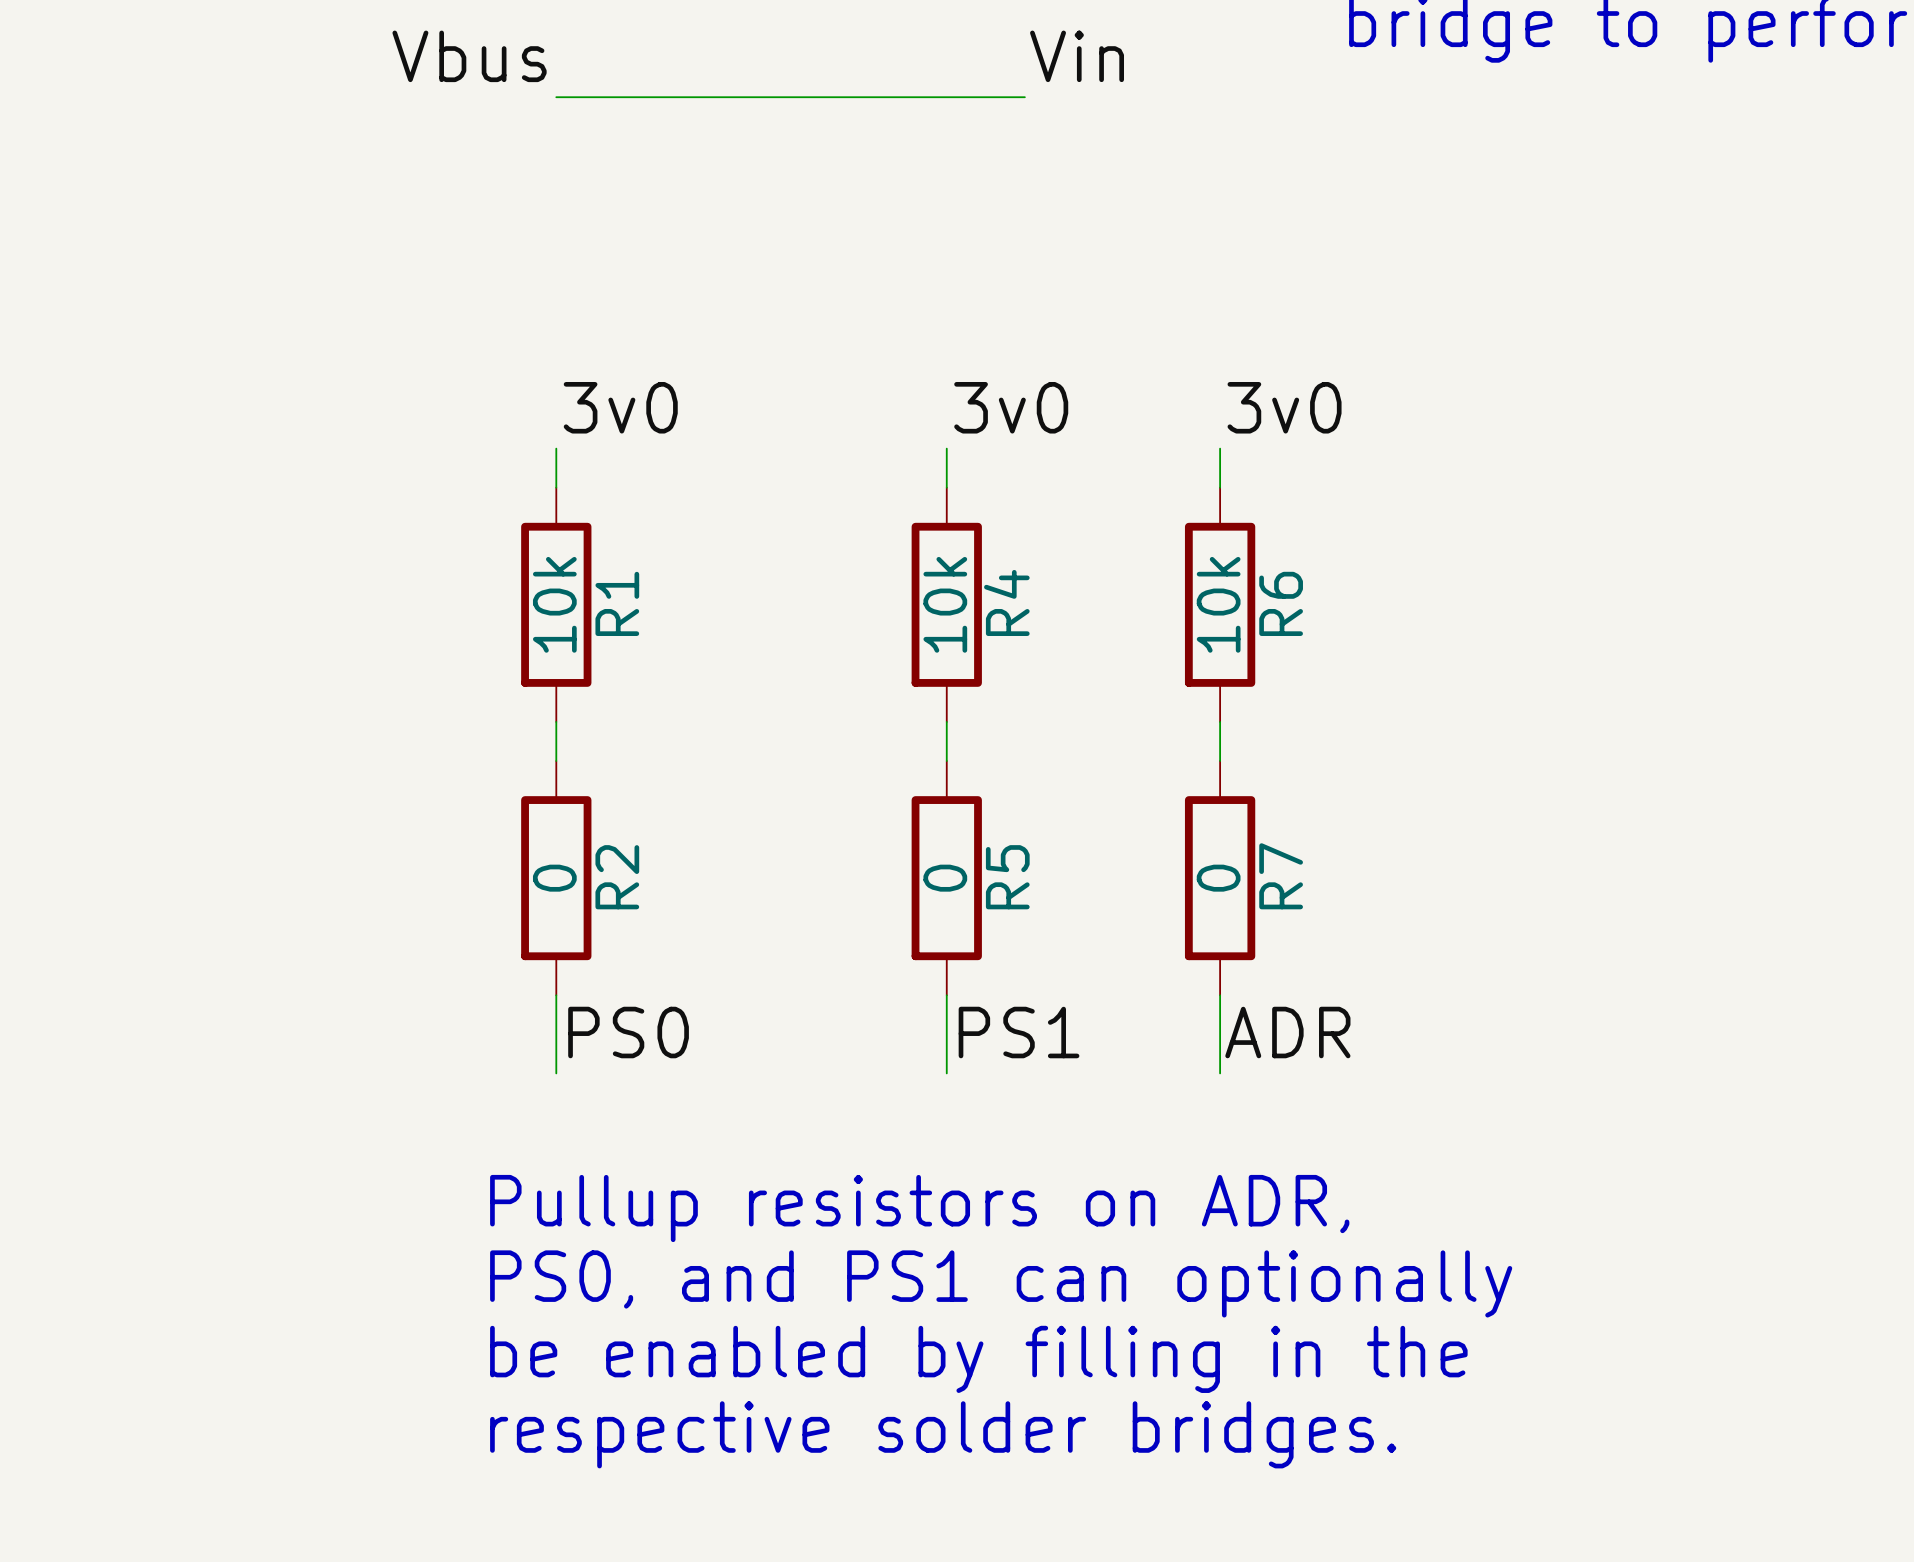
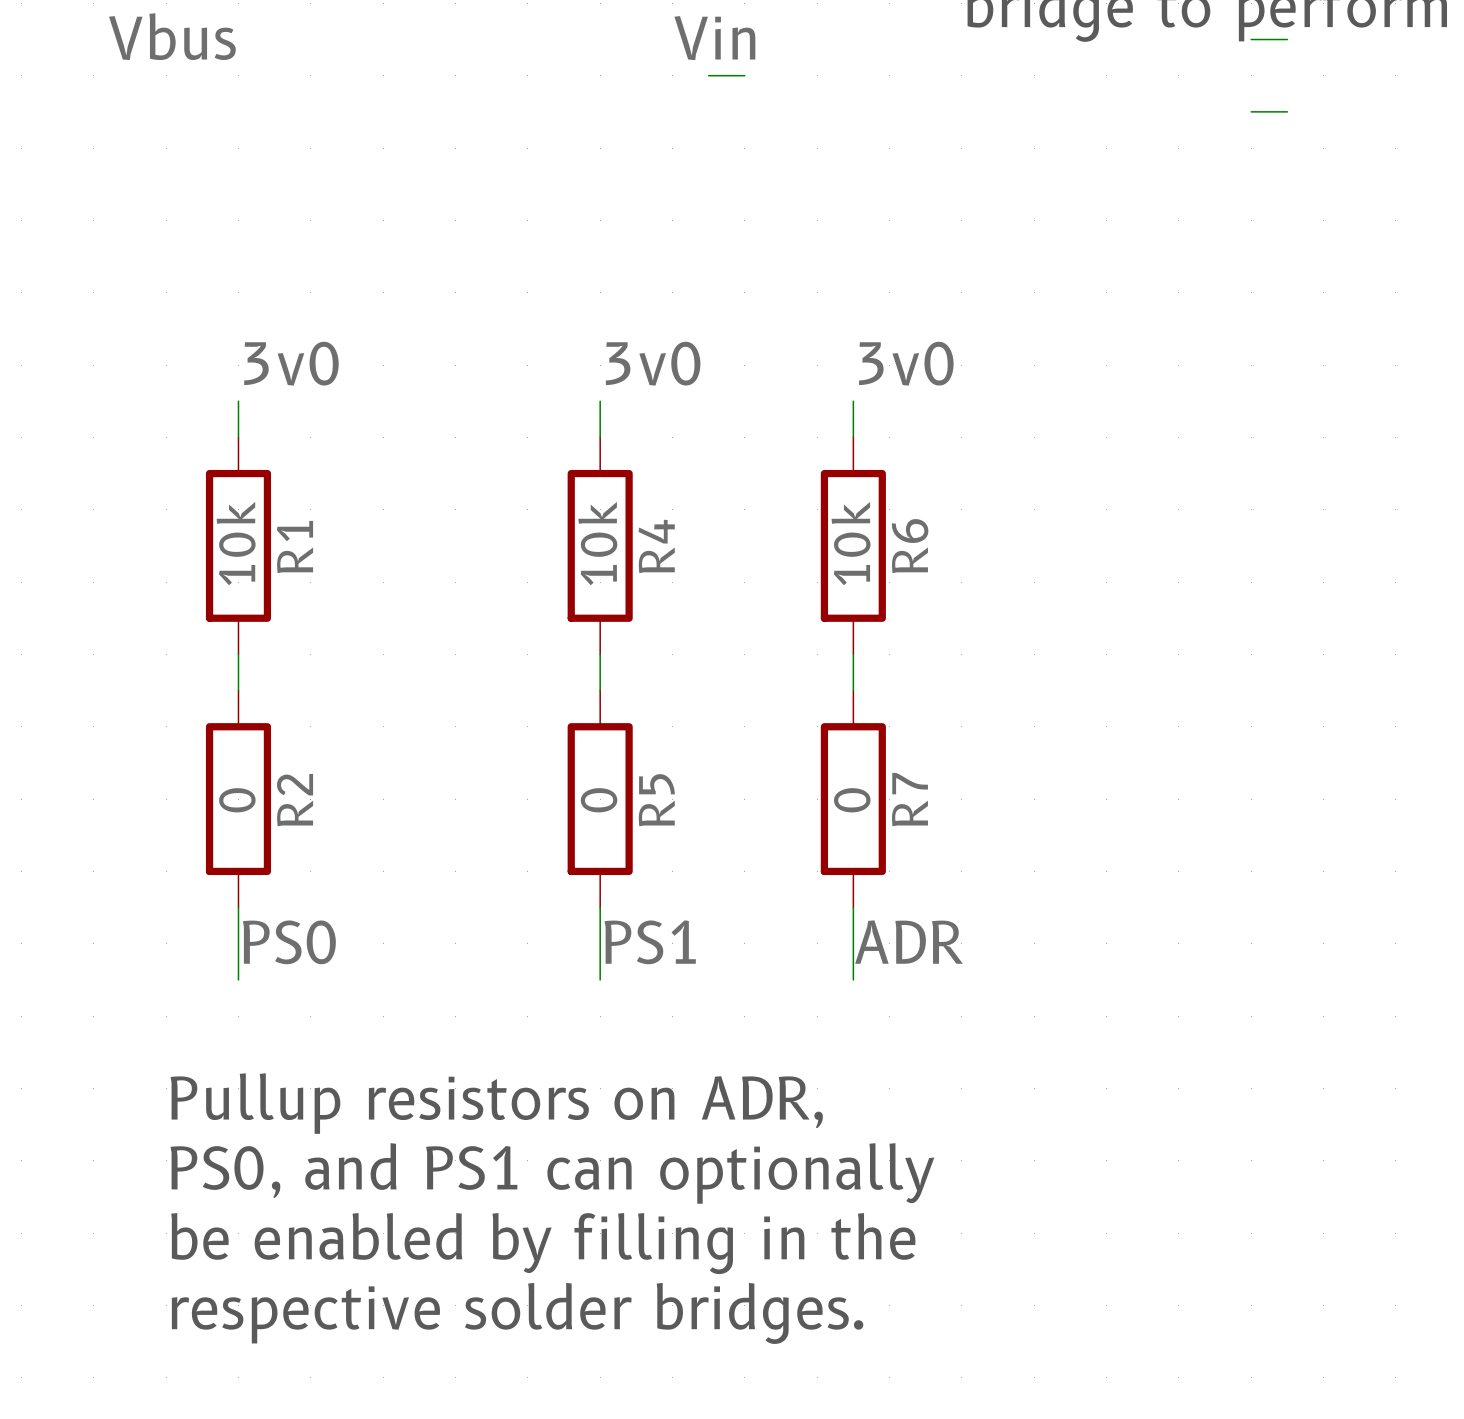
wire: none -> (1251, 39) (1287, 39)
wire: (556, 97) (1024, 97) -> none
wire: none -> (708, 75) (744, 75)
wire: none -> (1251, 111) (1287, 111)

